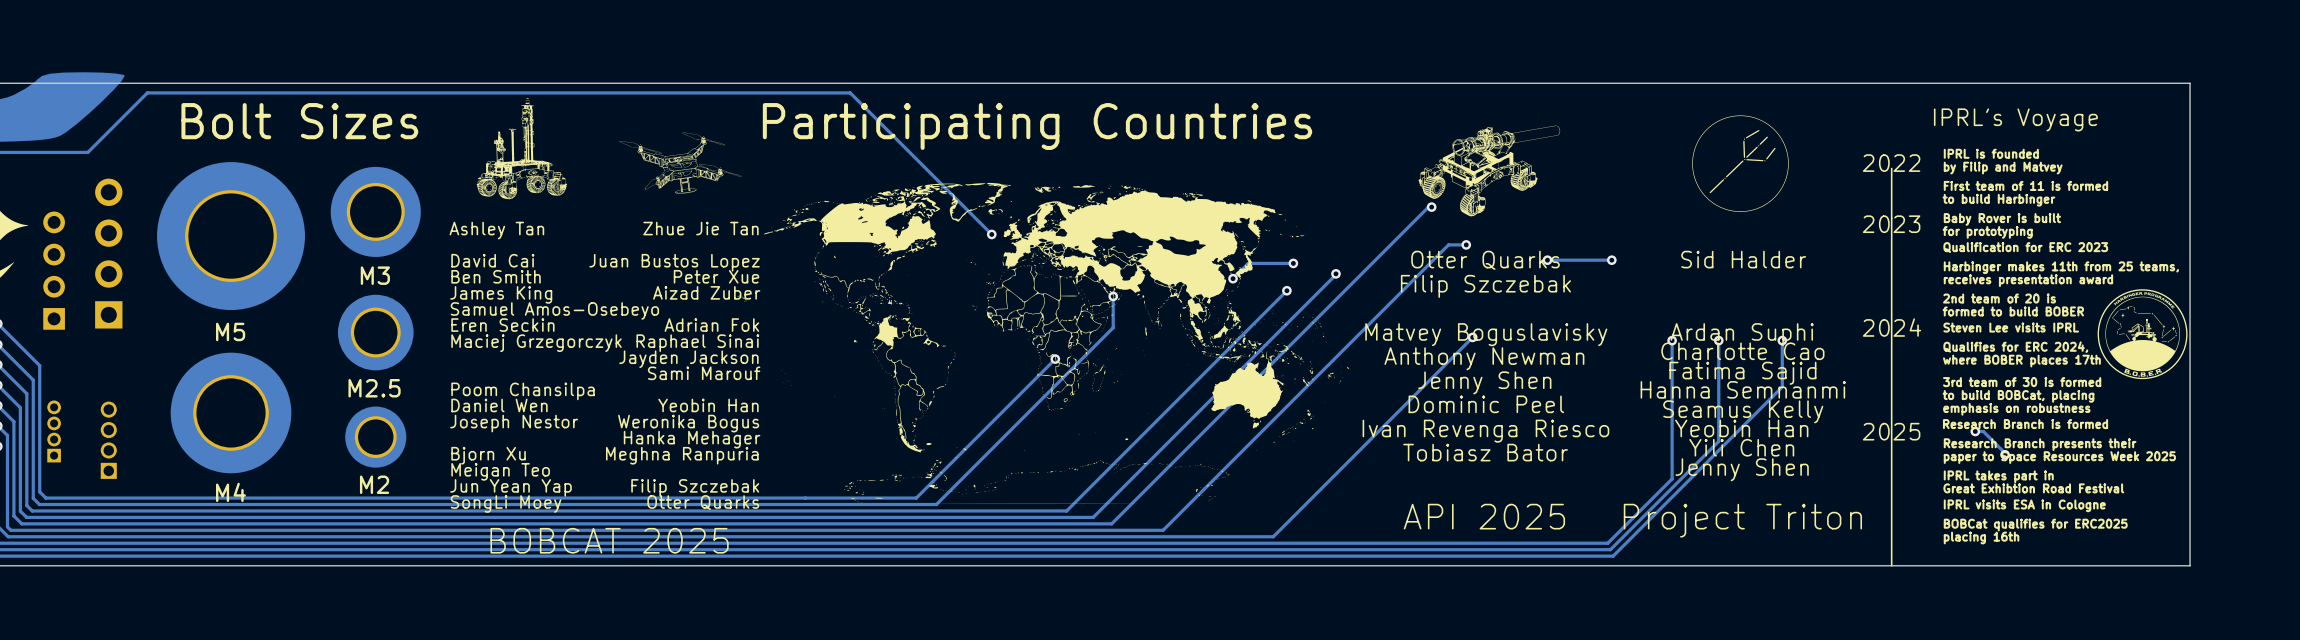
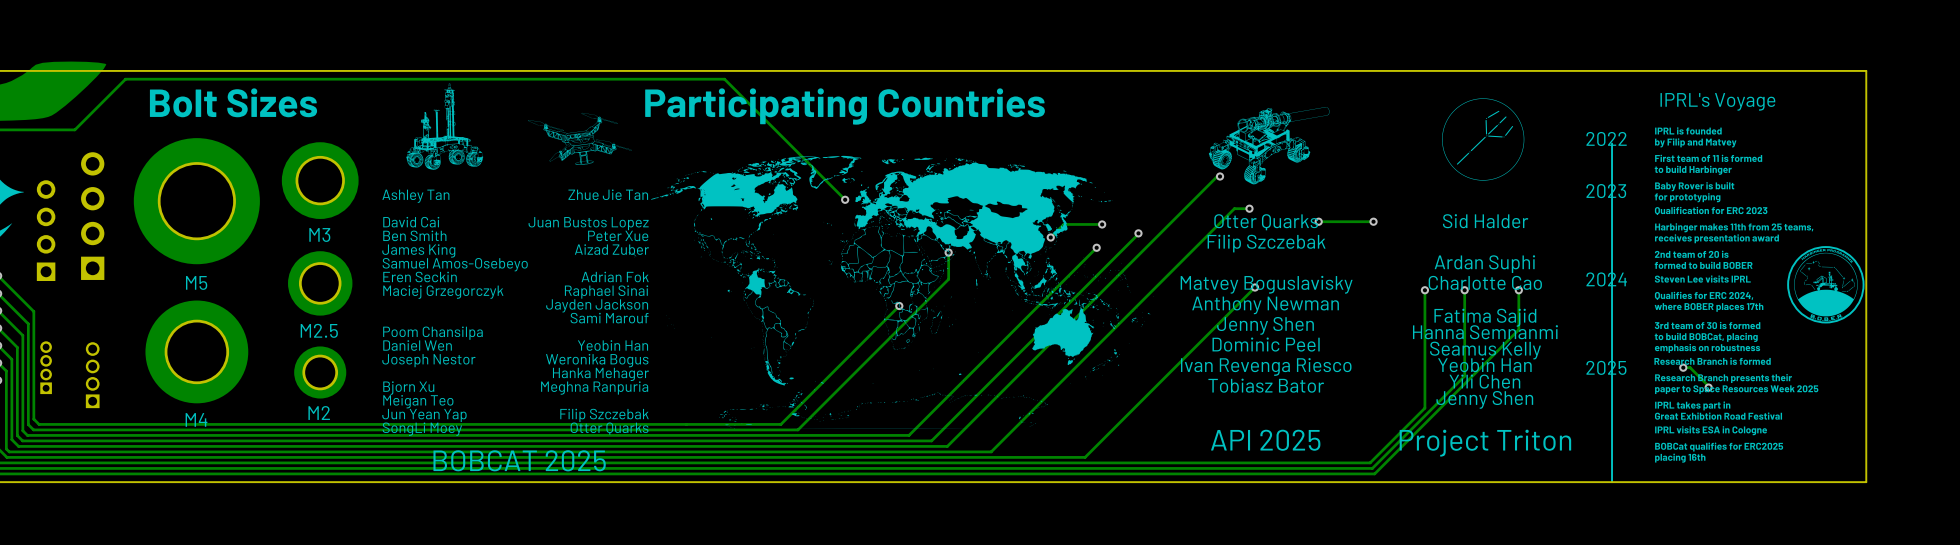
text: none -> Ardan Suphi (1484, 264)
text: Ardan Suphi (1742, 334) -> Charlotte Cao (1485, 282)
text: Charlotte Cao (1742, 351) -> none

